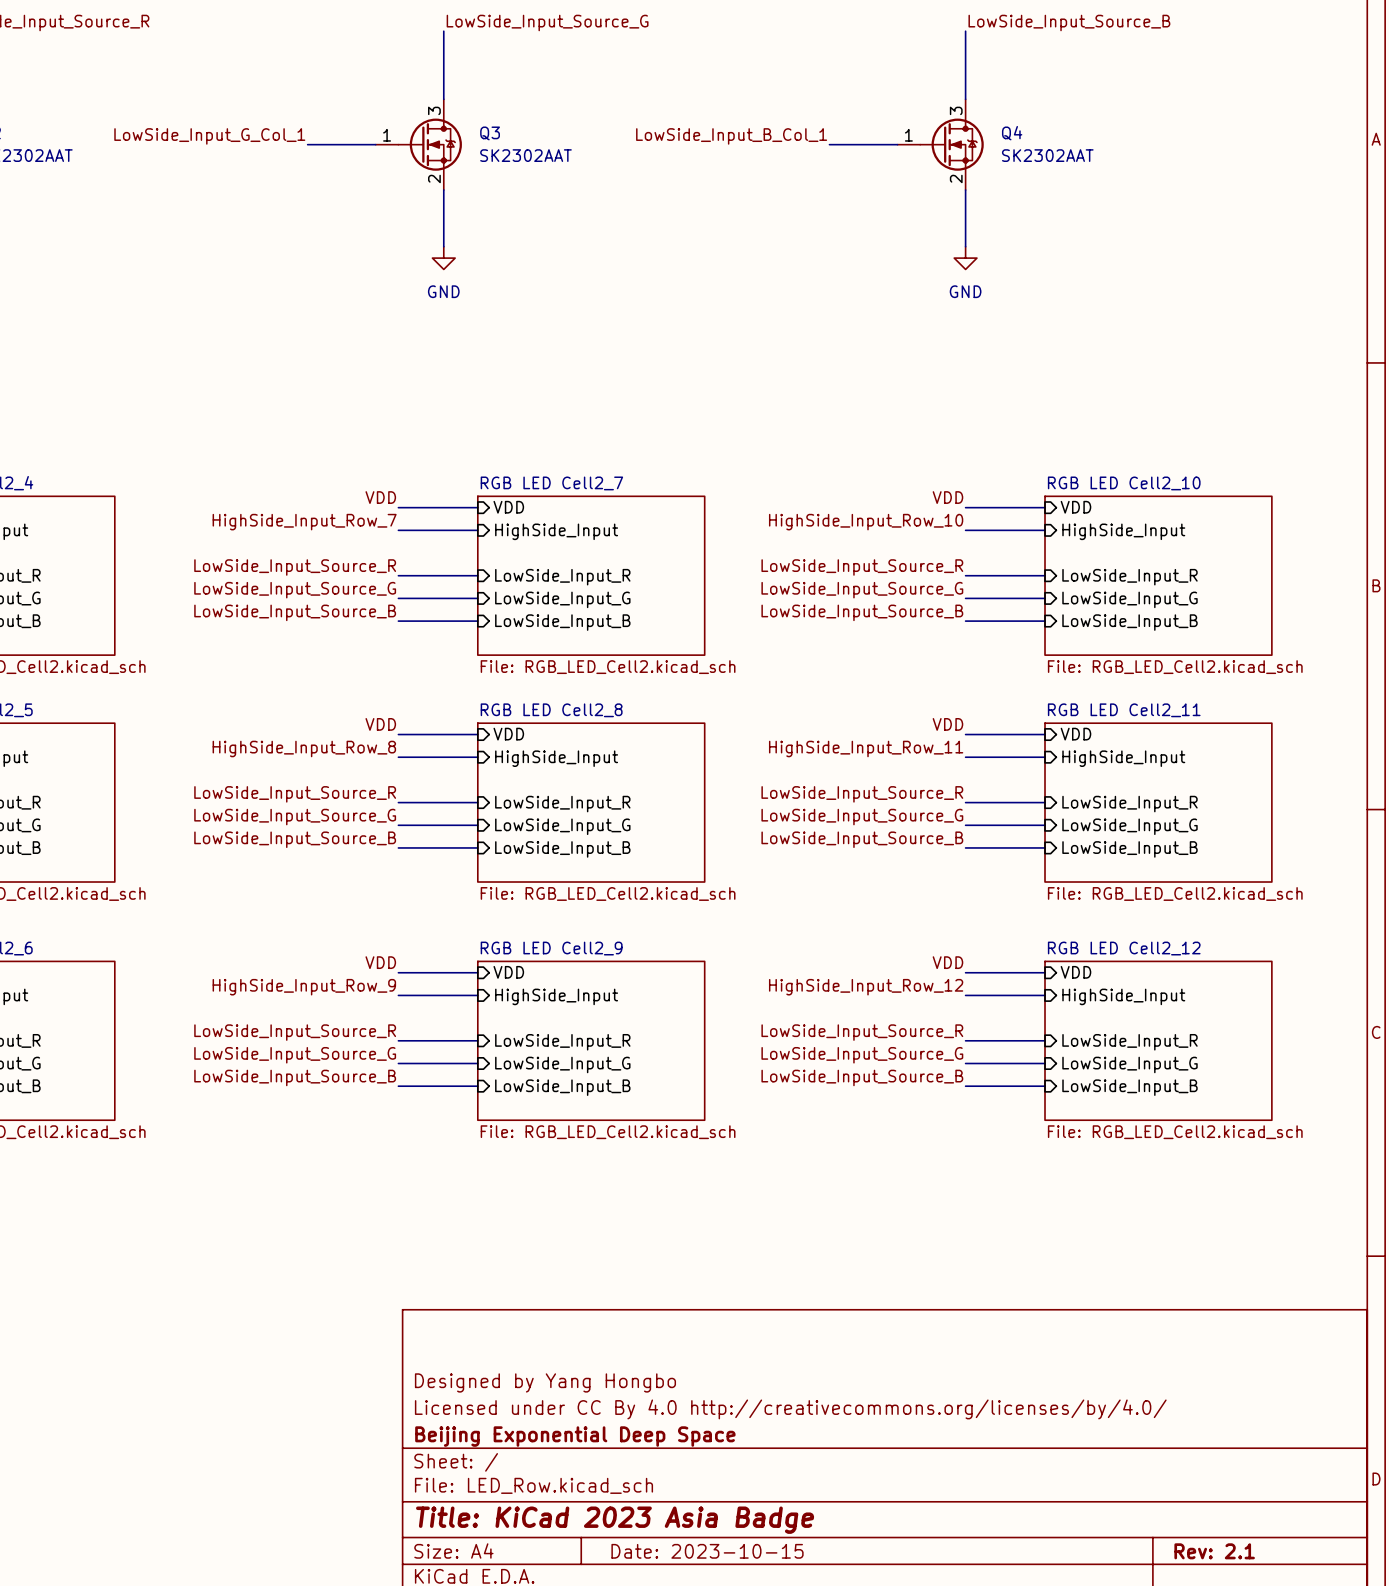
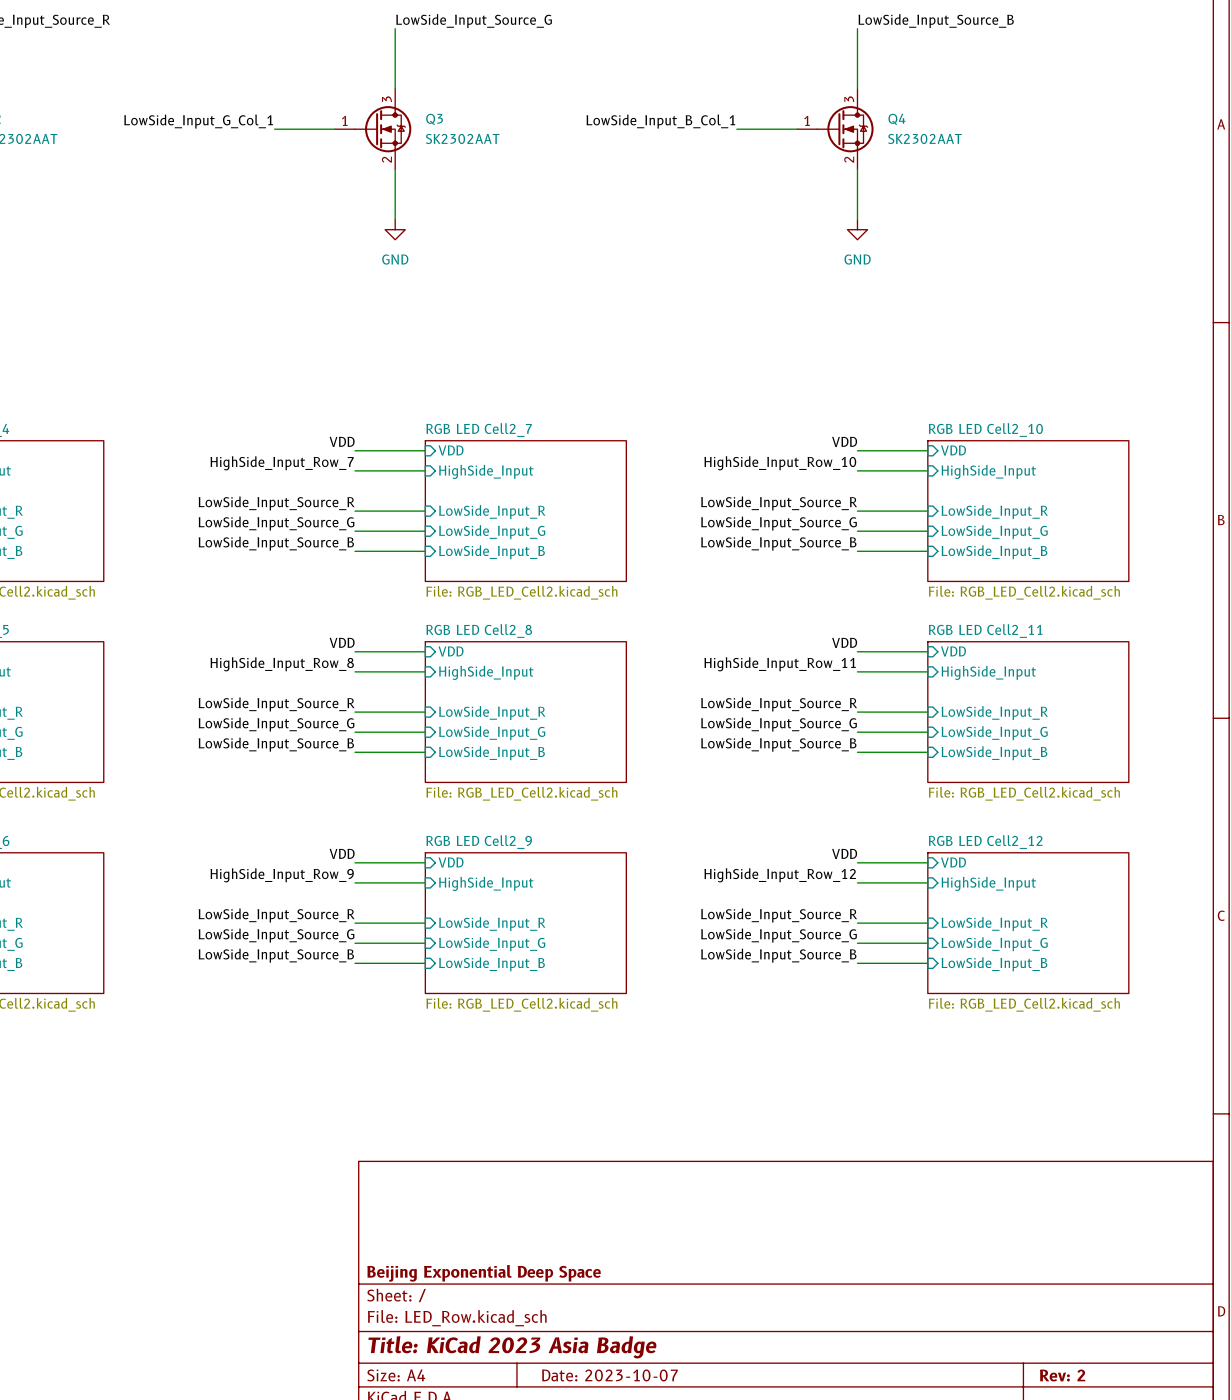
title block: Designed by Yang Hongbo (545, 1382) -> none
title block: Licensed under CC By 4.0 http://creativecommons.org/licenses/by/4.0/ (790, 1409) -> none
title block: Date: 2023-10-15 (707, 1551) -> Date: 2023-10-07 (609, 1375)
title block: Rev: 2.1 (1214, 1551) -> Rev: 2 (1062, 1375)

